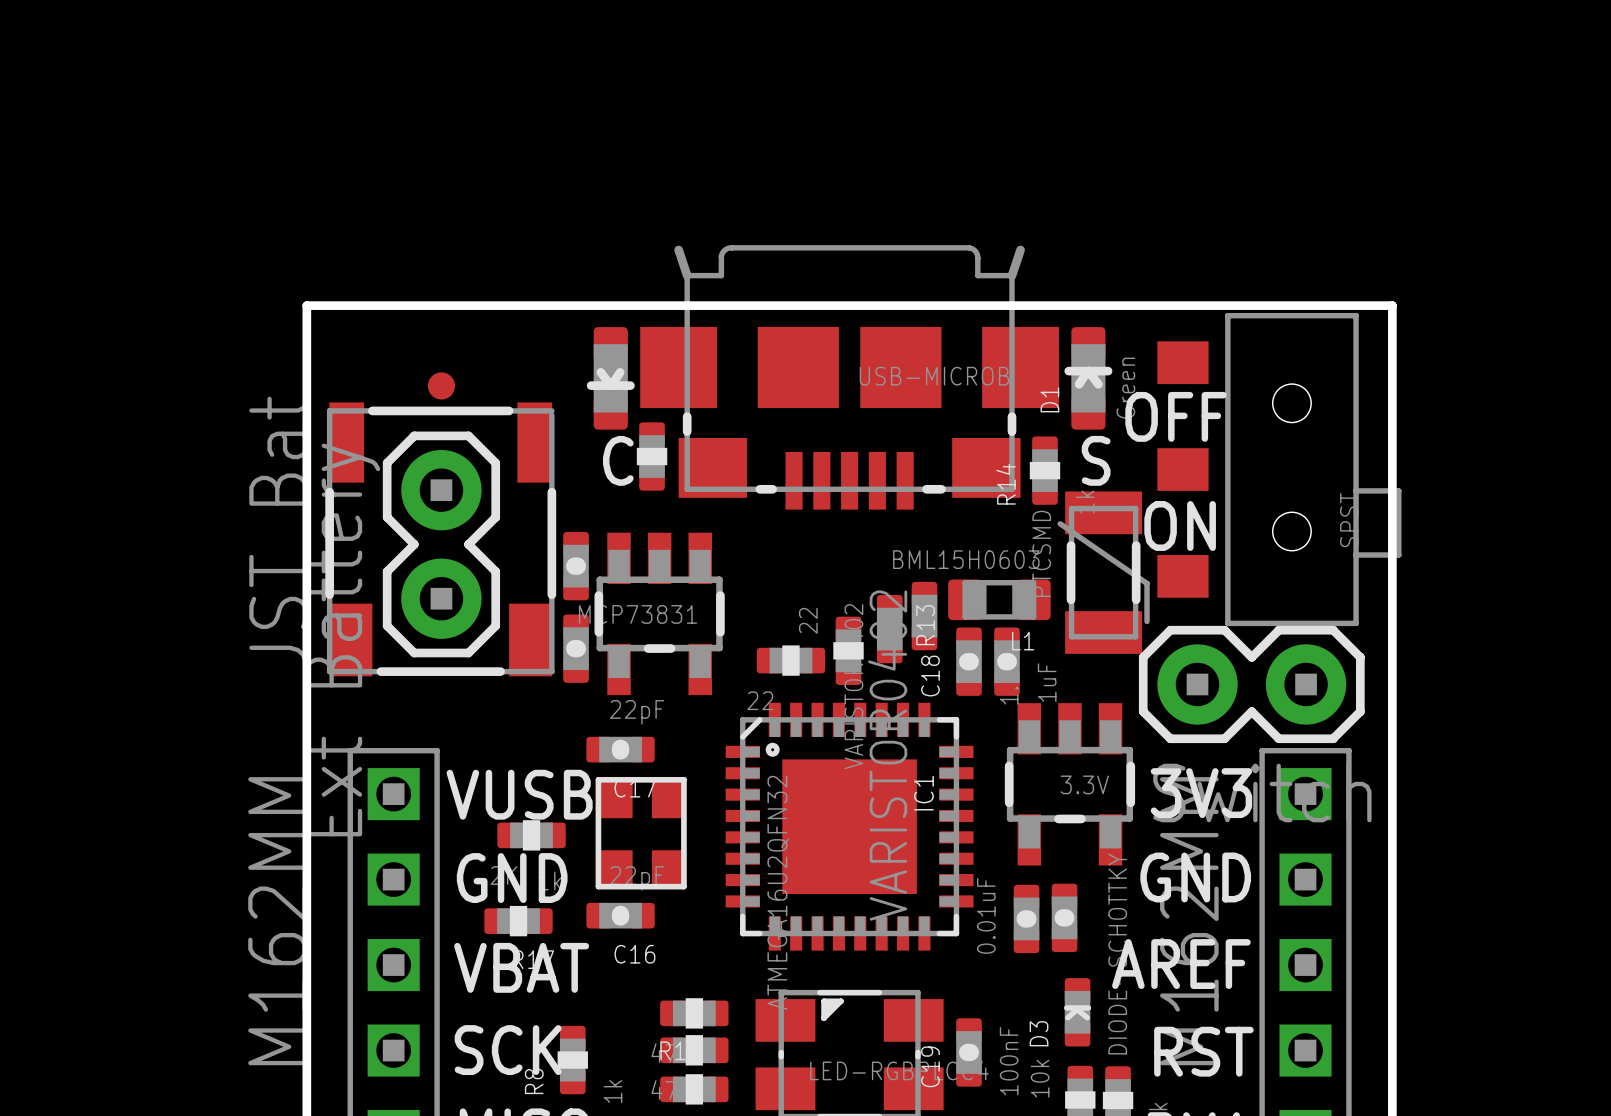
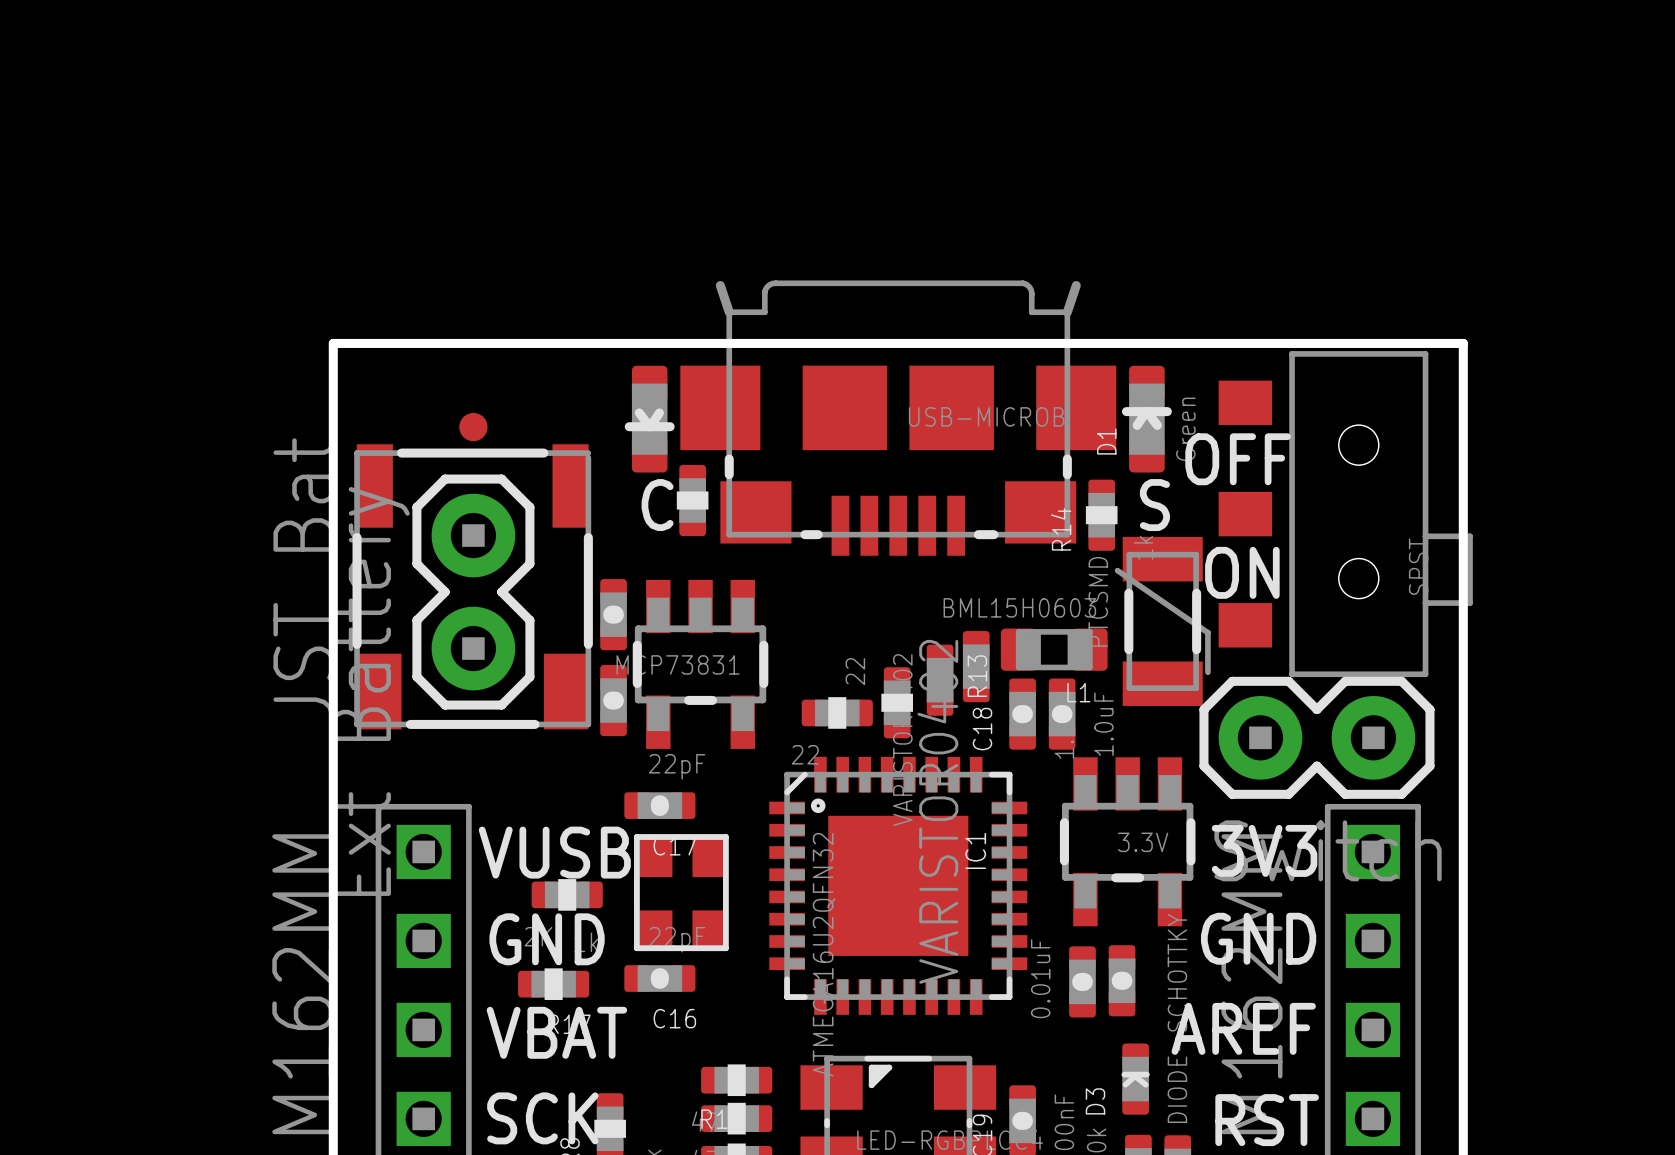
part value: 1uF (1047, 682) -> 1.0uF (1103, 724)

